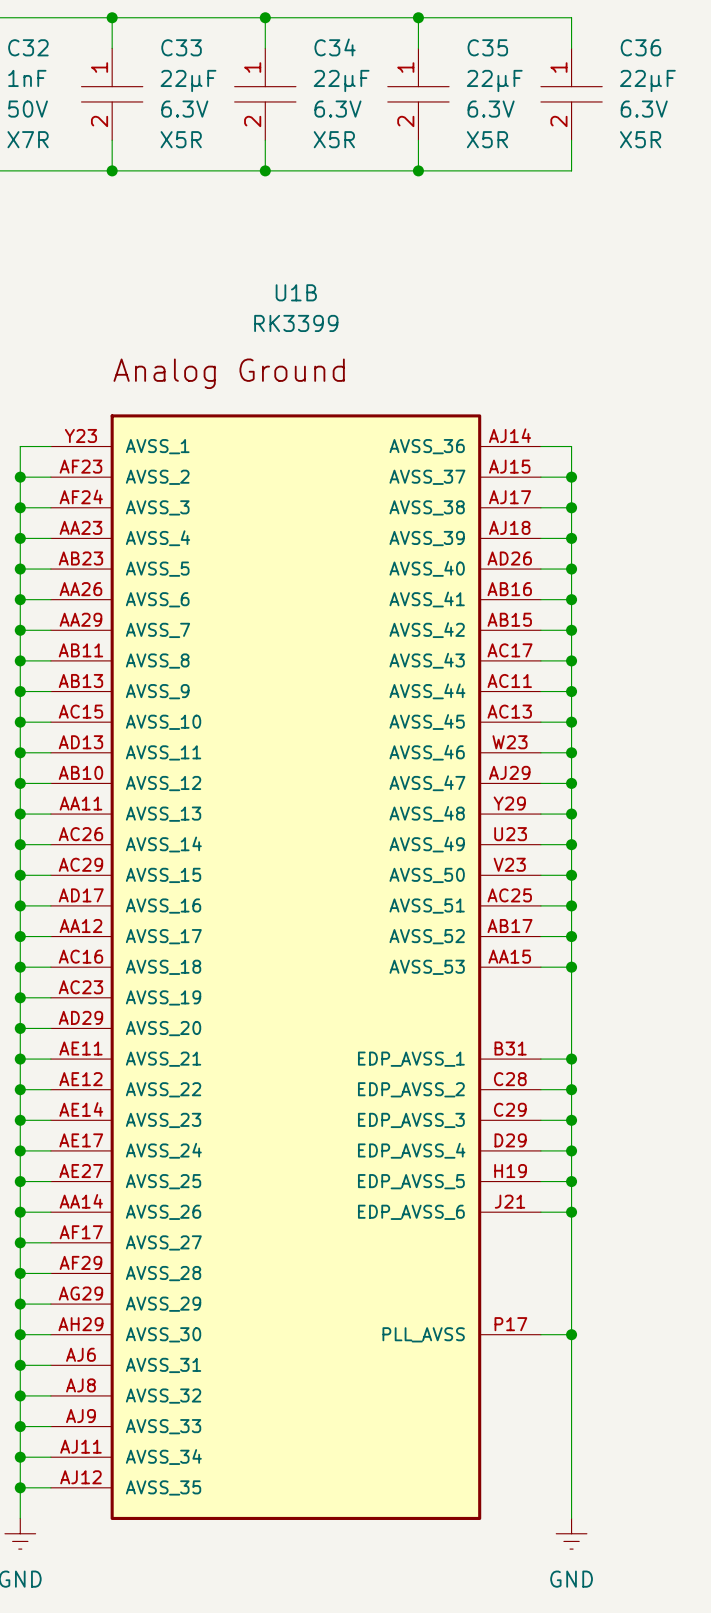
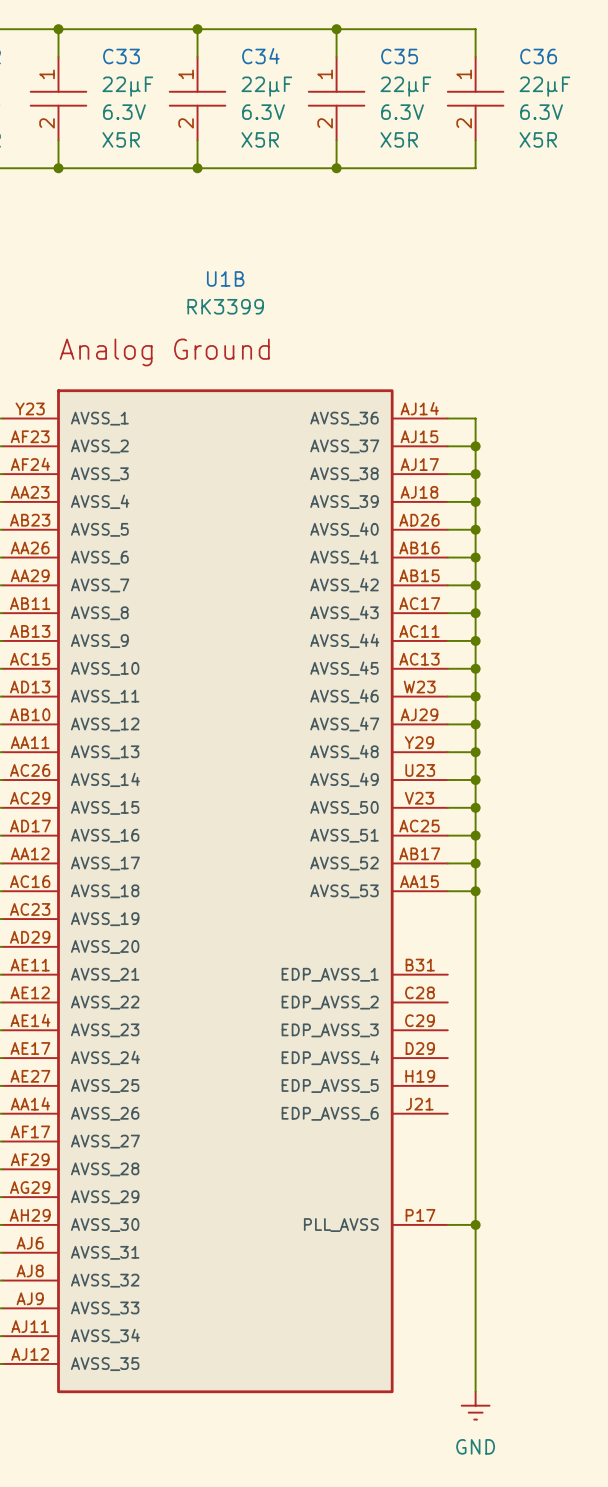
wire: (540, 1059) (571, 1059) -> none
junction: (571, 1059) -> none
wire: (540, 1089) (571, 1089) -> none
junction: (571, 1089) -> none
wire: (540, 1120) (571, 1120) -> none
junction: (571, 1120) -> none
wire: (540, 1150) (571, 1150) -> none
junction: (571, 1150) -> none
wire: (540, 1181) (571, 1181) -> none
junction: (571, 1181) -> none
wire: (540, 1212) (571, 1212) -> none
junction: (571, 1212) -> none

